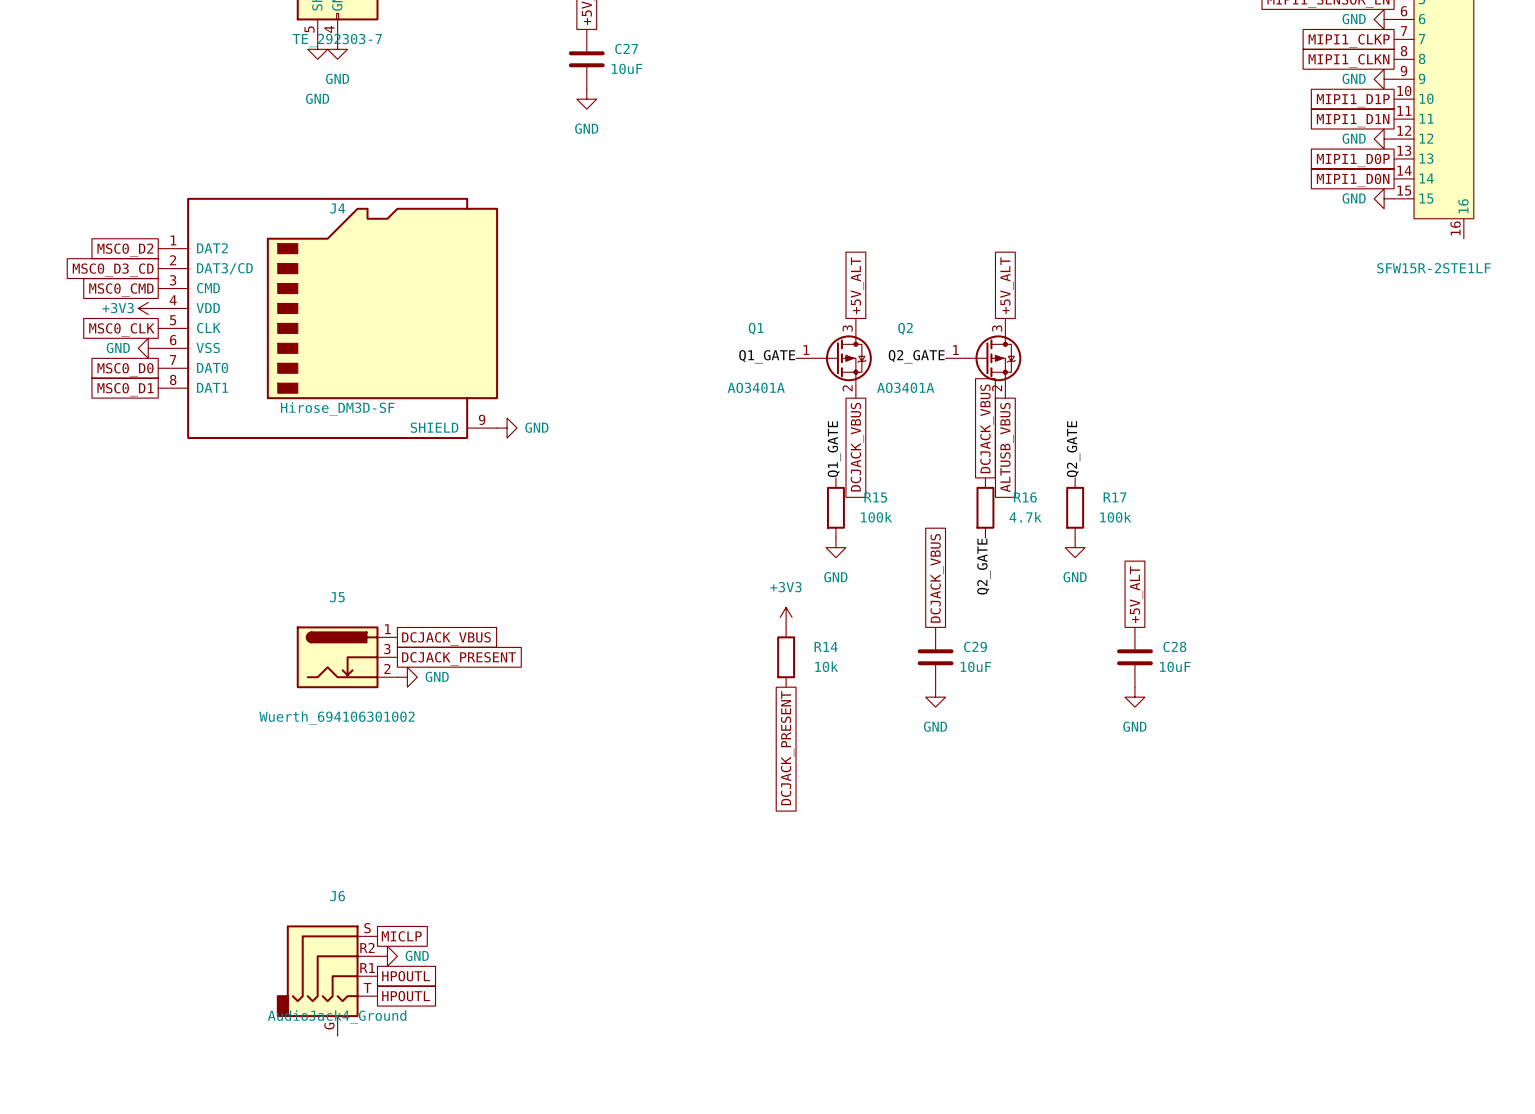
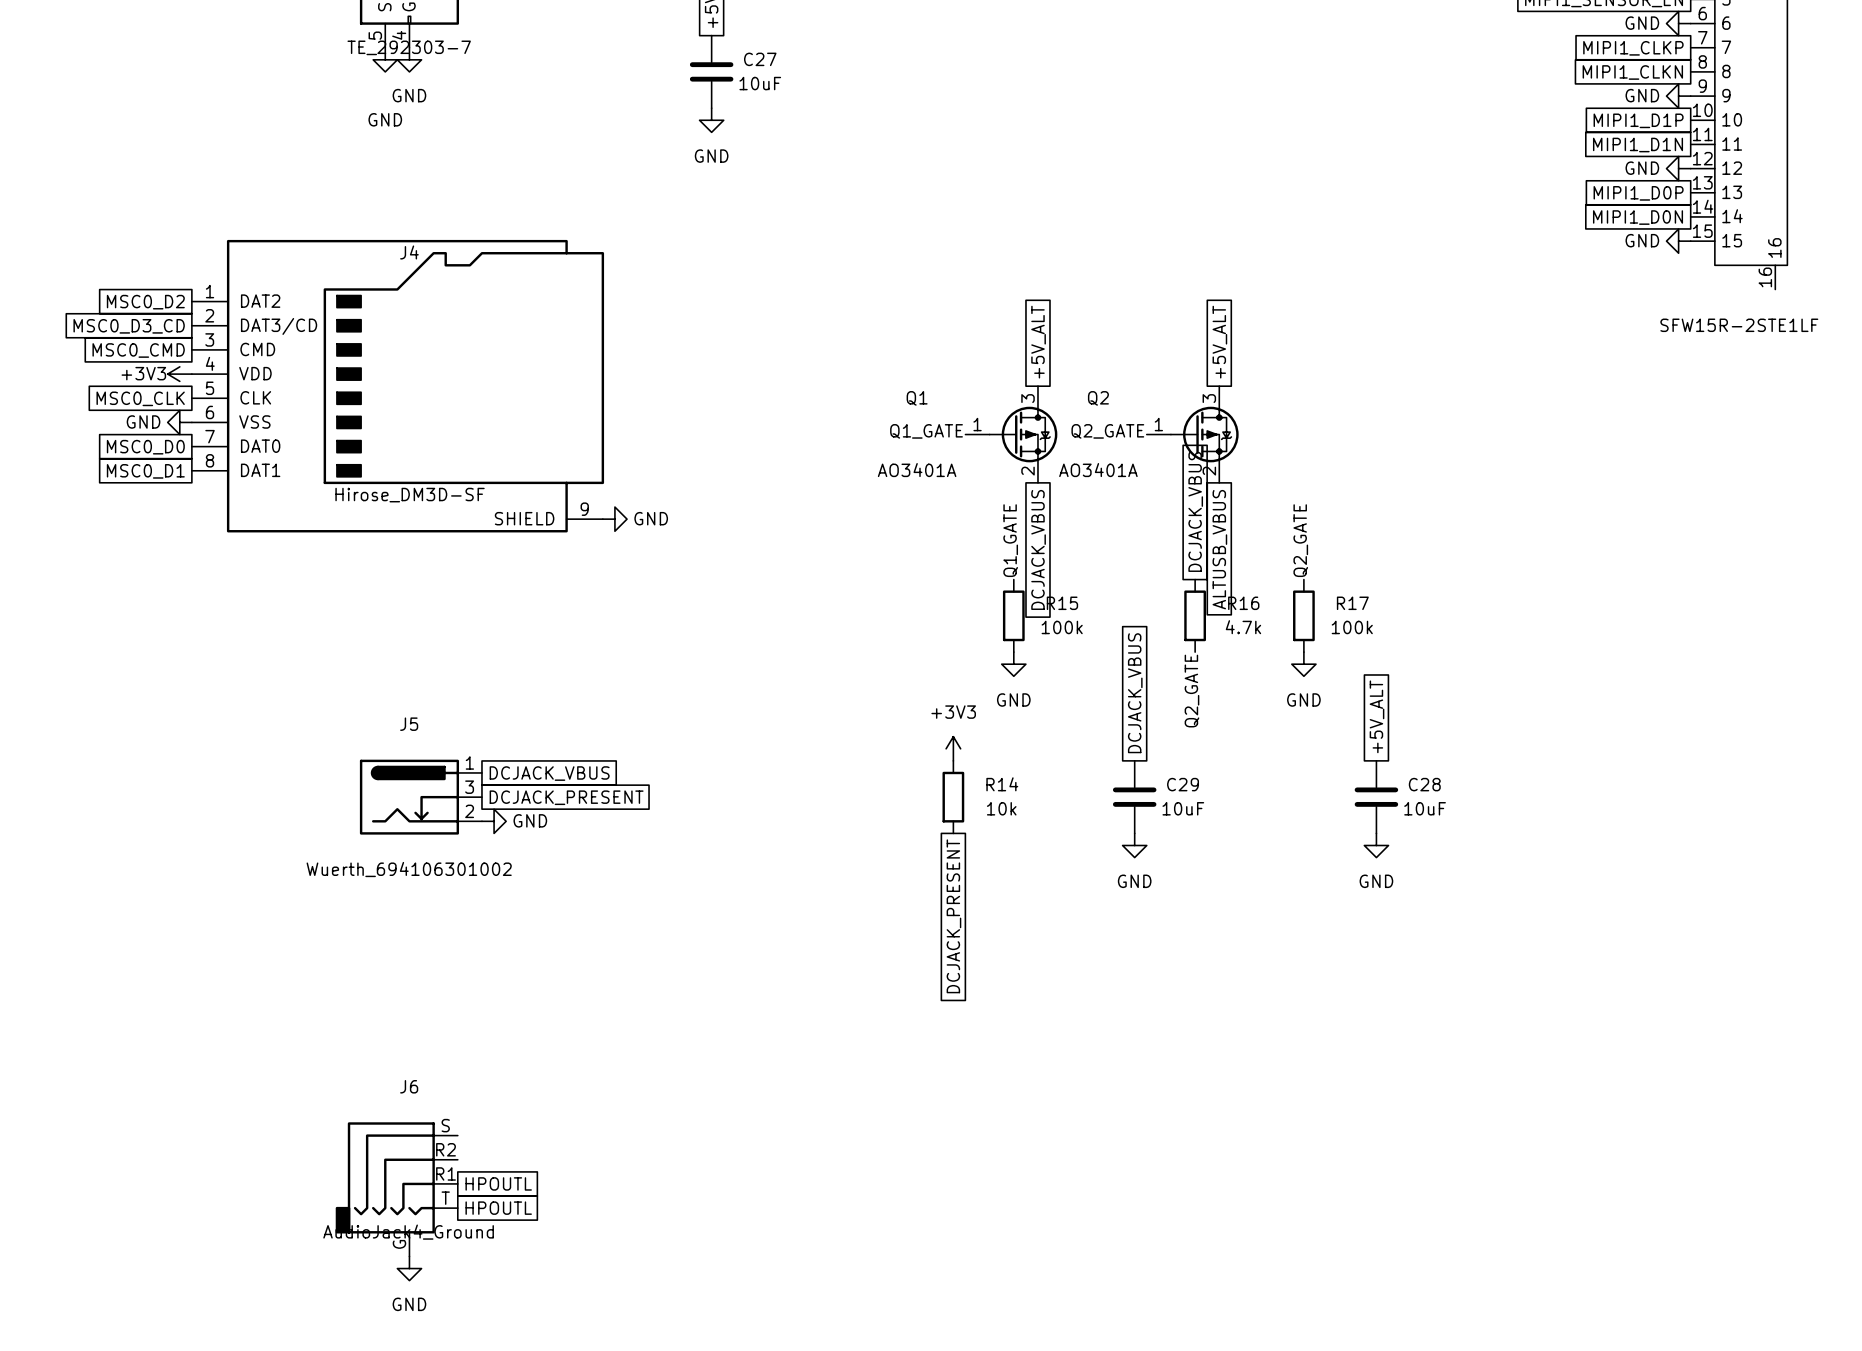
global label: MICLP (401, 936) -> none
power symbol rotation: 0° (387, 956) -> 90° clockwise (409, 1268)
power symbol position: GND (387, 956) -> GND (409, 1268)

